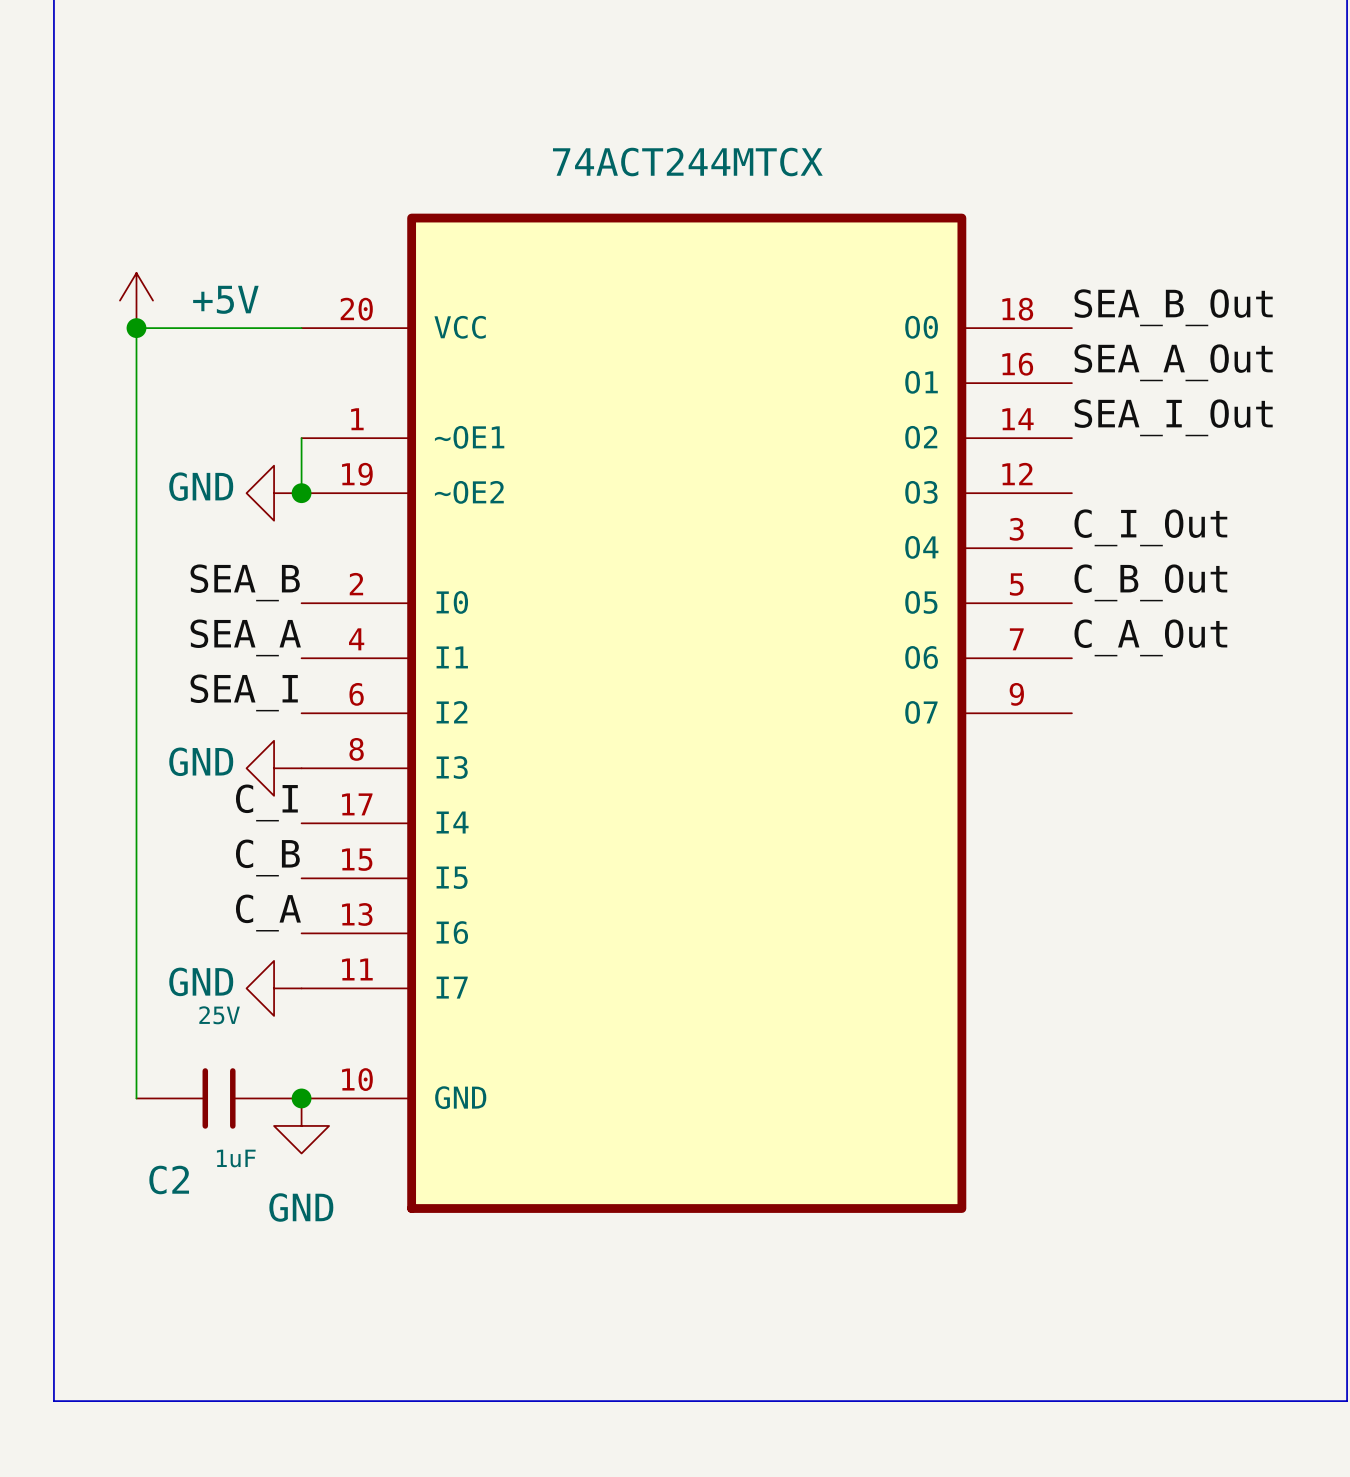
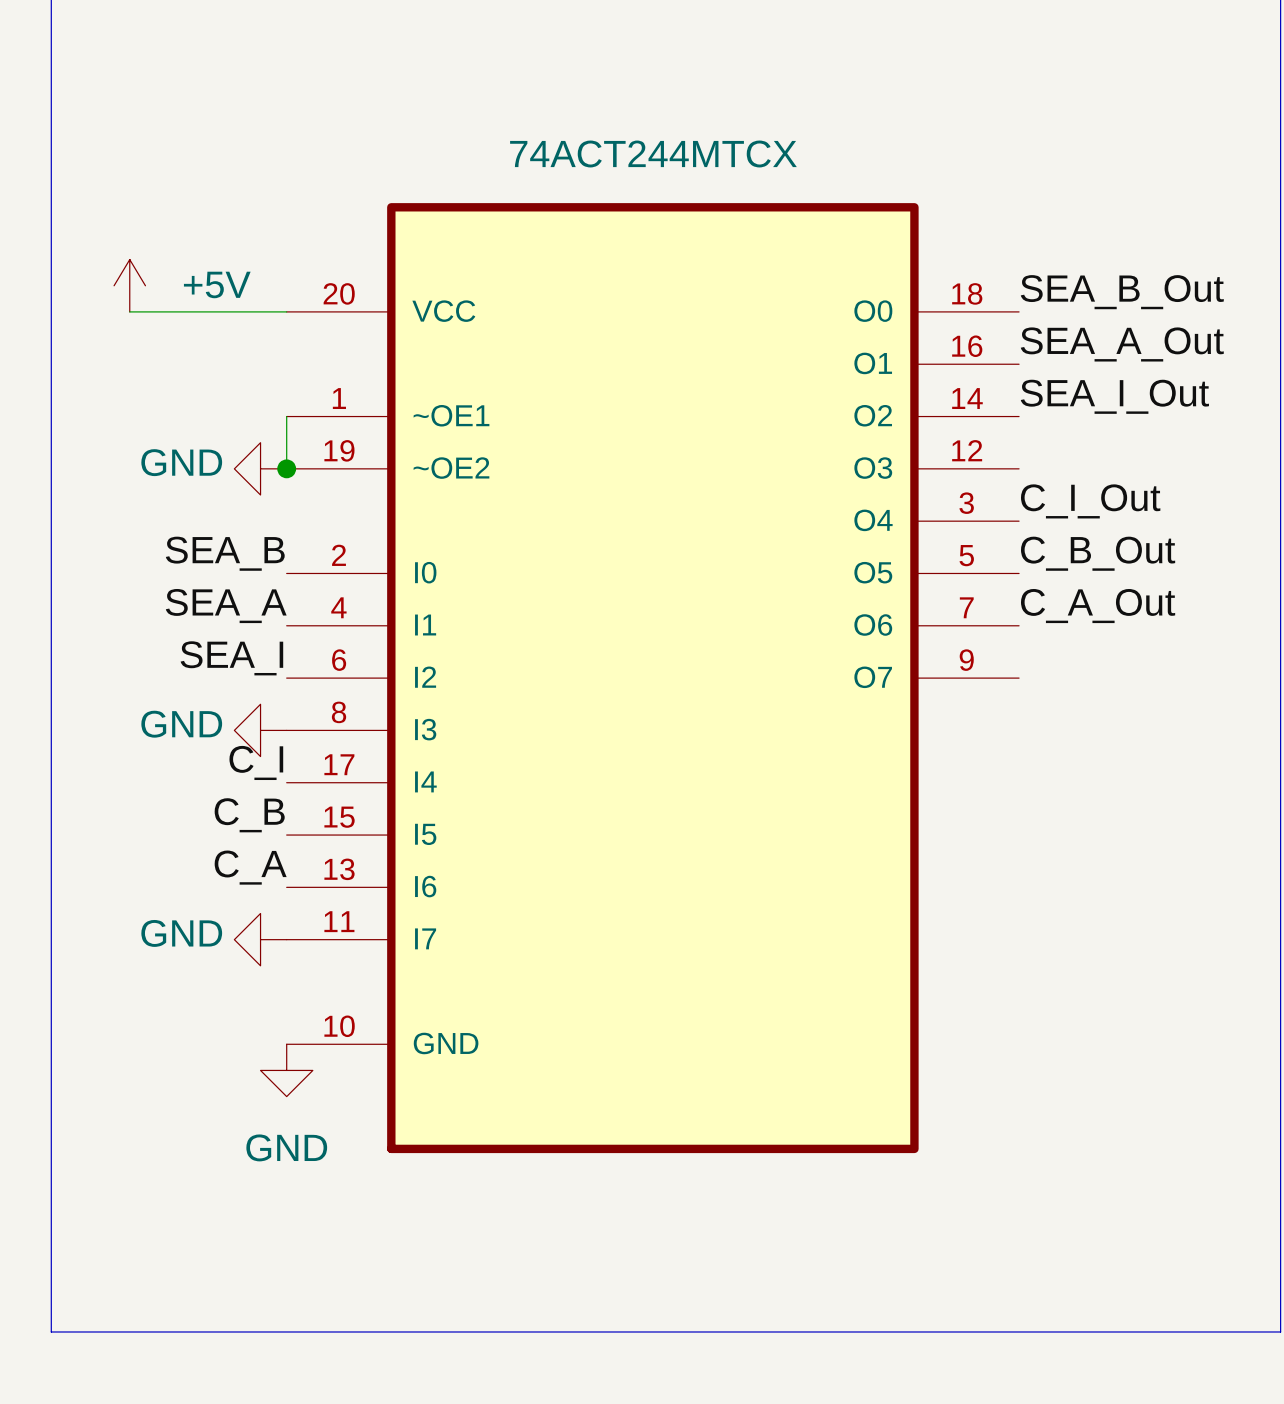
wire: (136, 328) (136, 1098) -> none
junction: (136, 328) -> none
C2: 1uF (219, 1098) -> none
junction: (301, 1098) -> none

